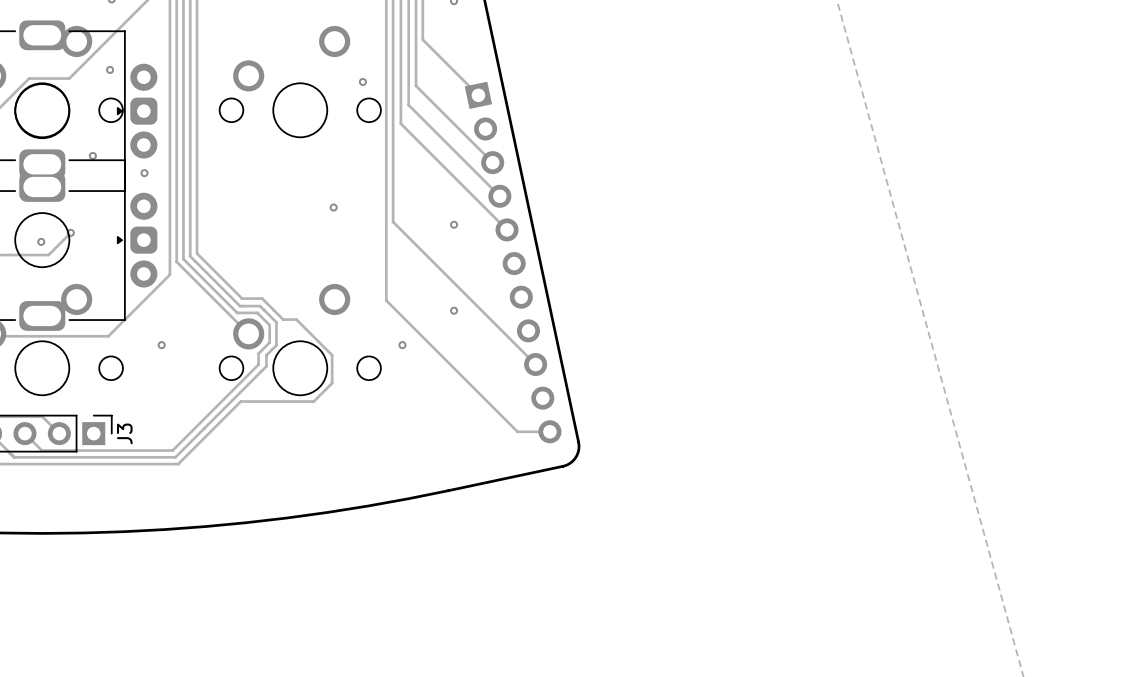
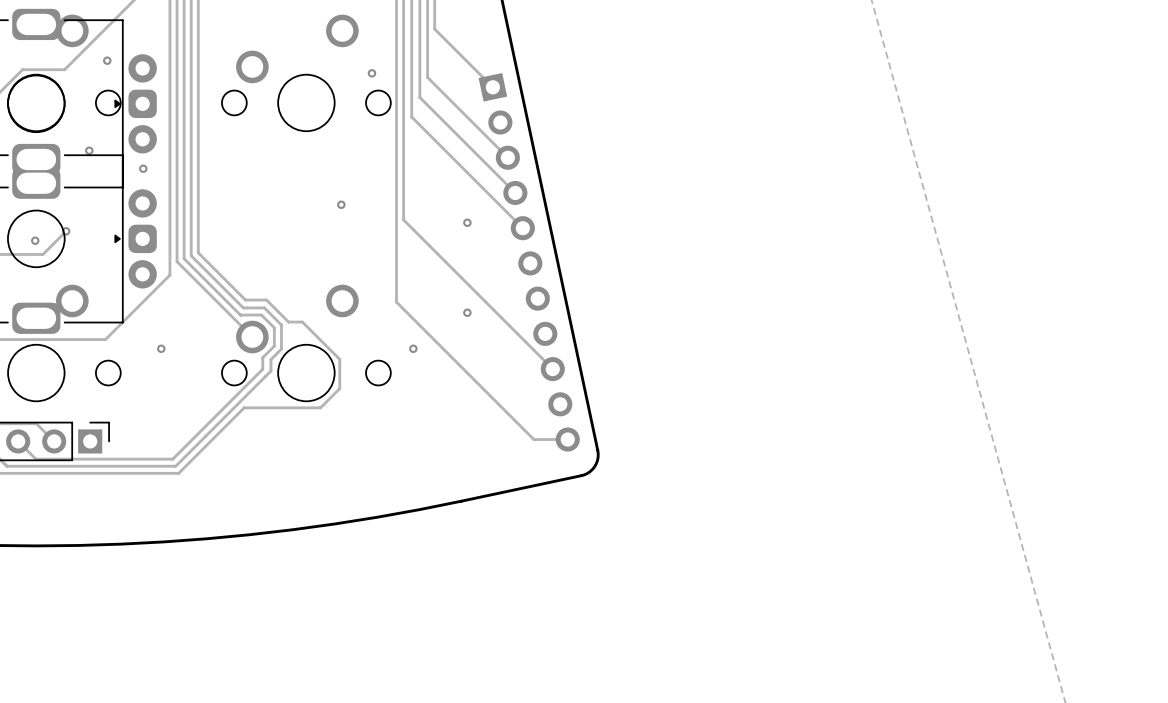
J3 name: J3 (124, 433) -> none

